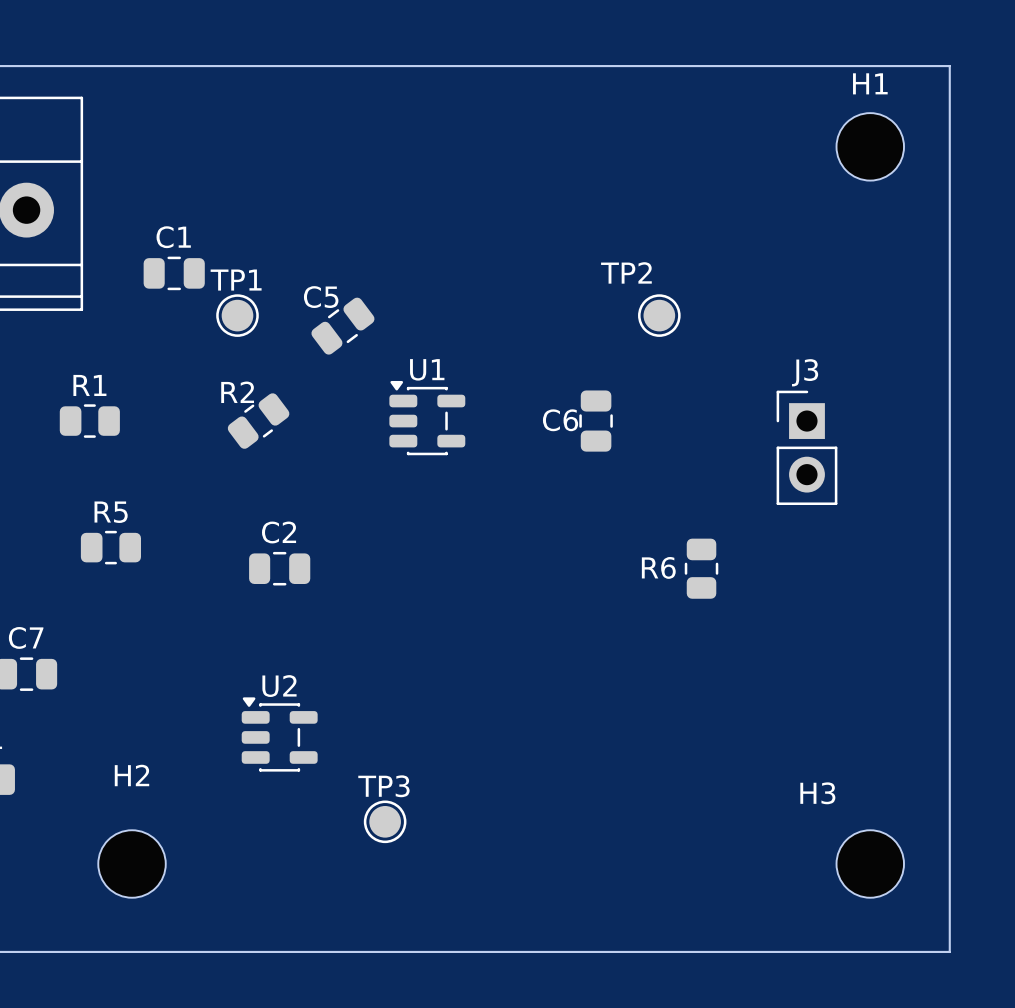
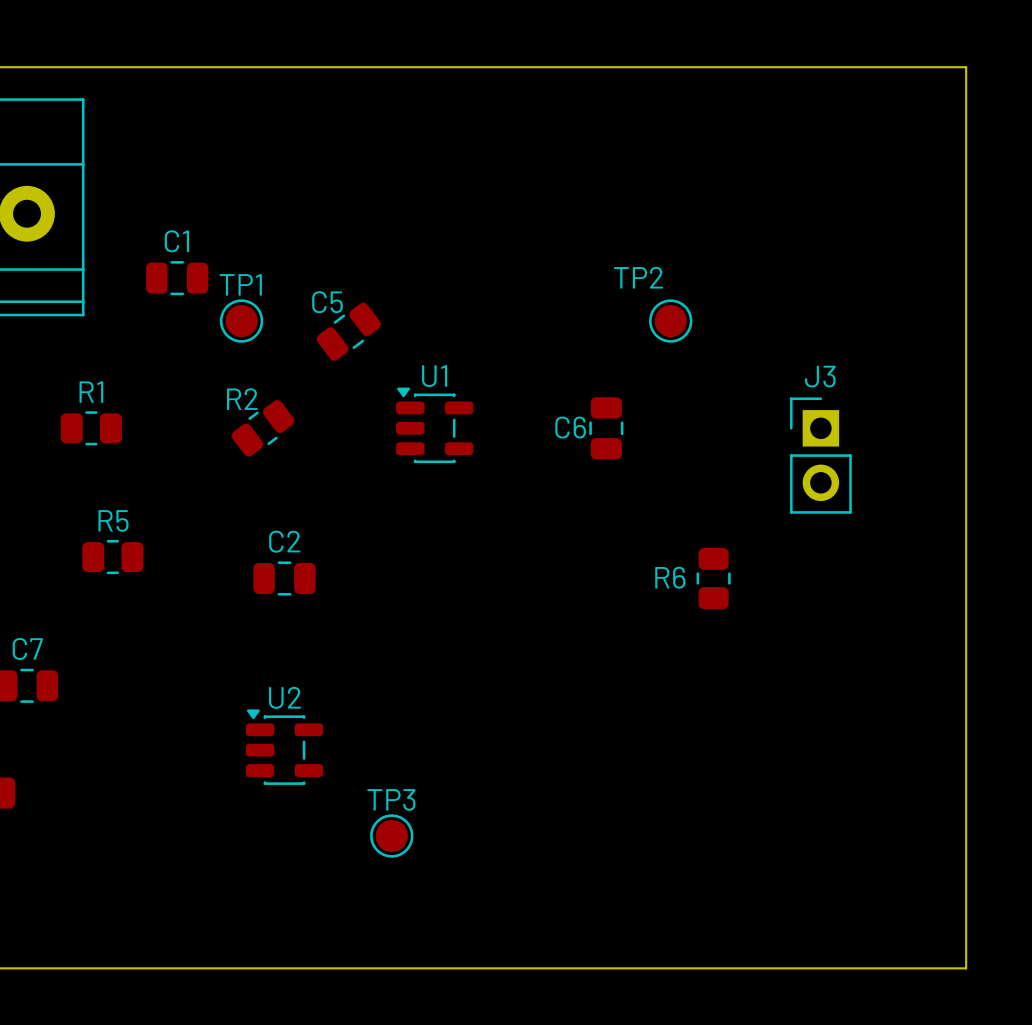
H1: (870, 146) -> none
H2: (132, 863) -> none
H3: (870, 863) -> none

